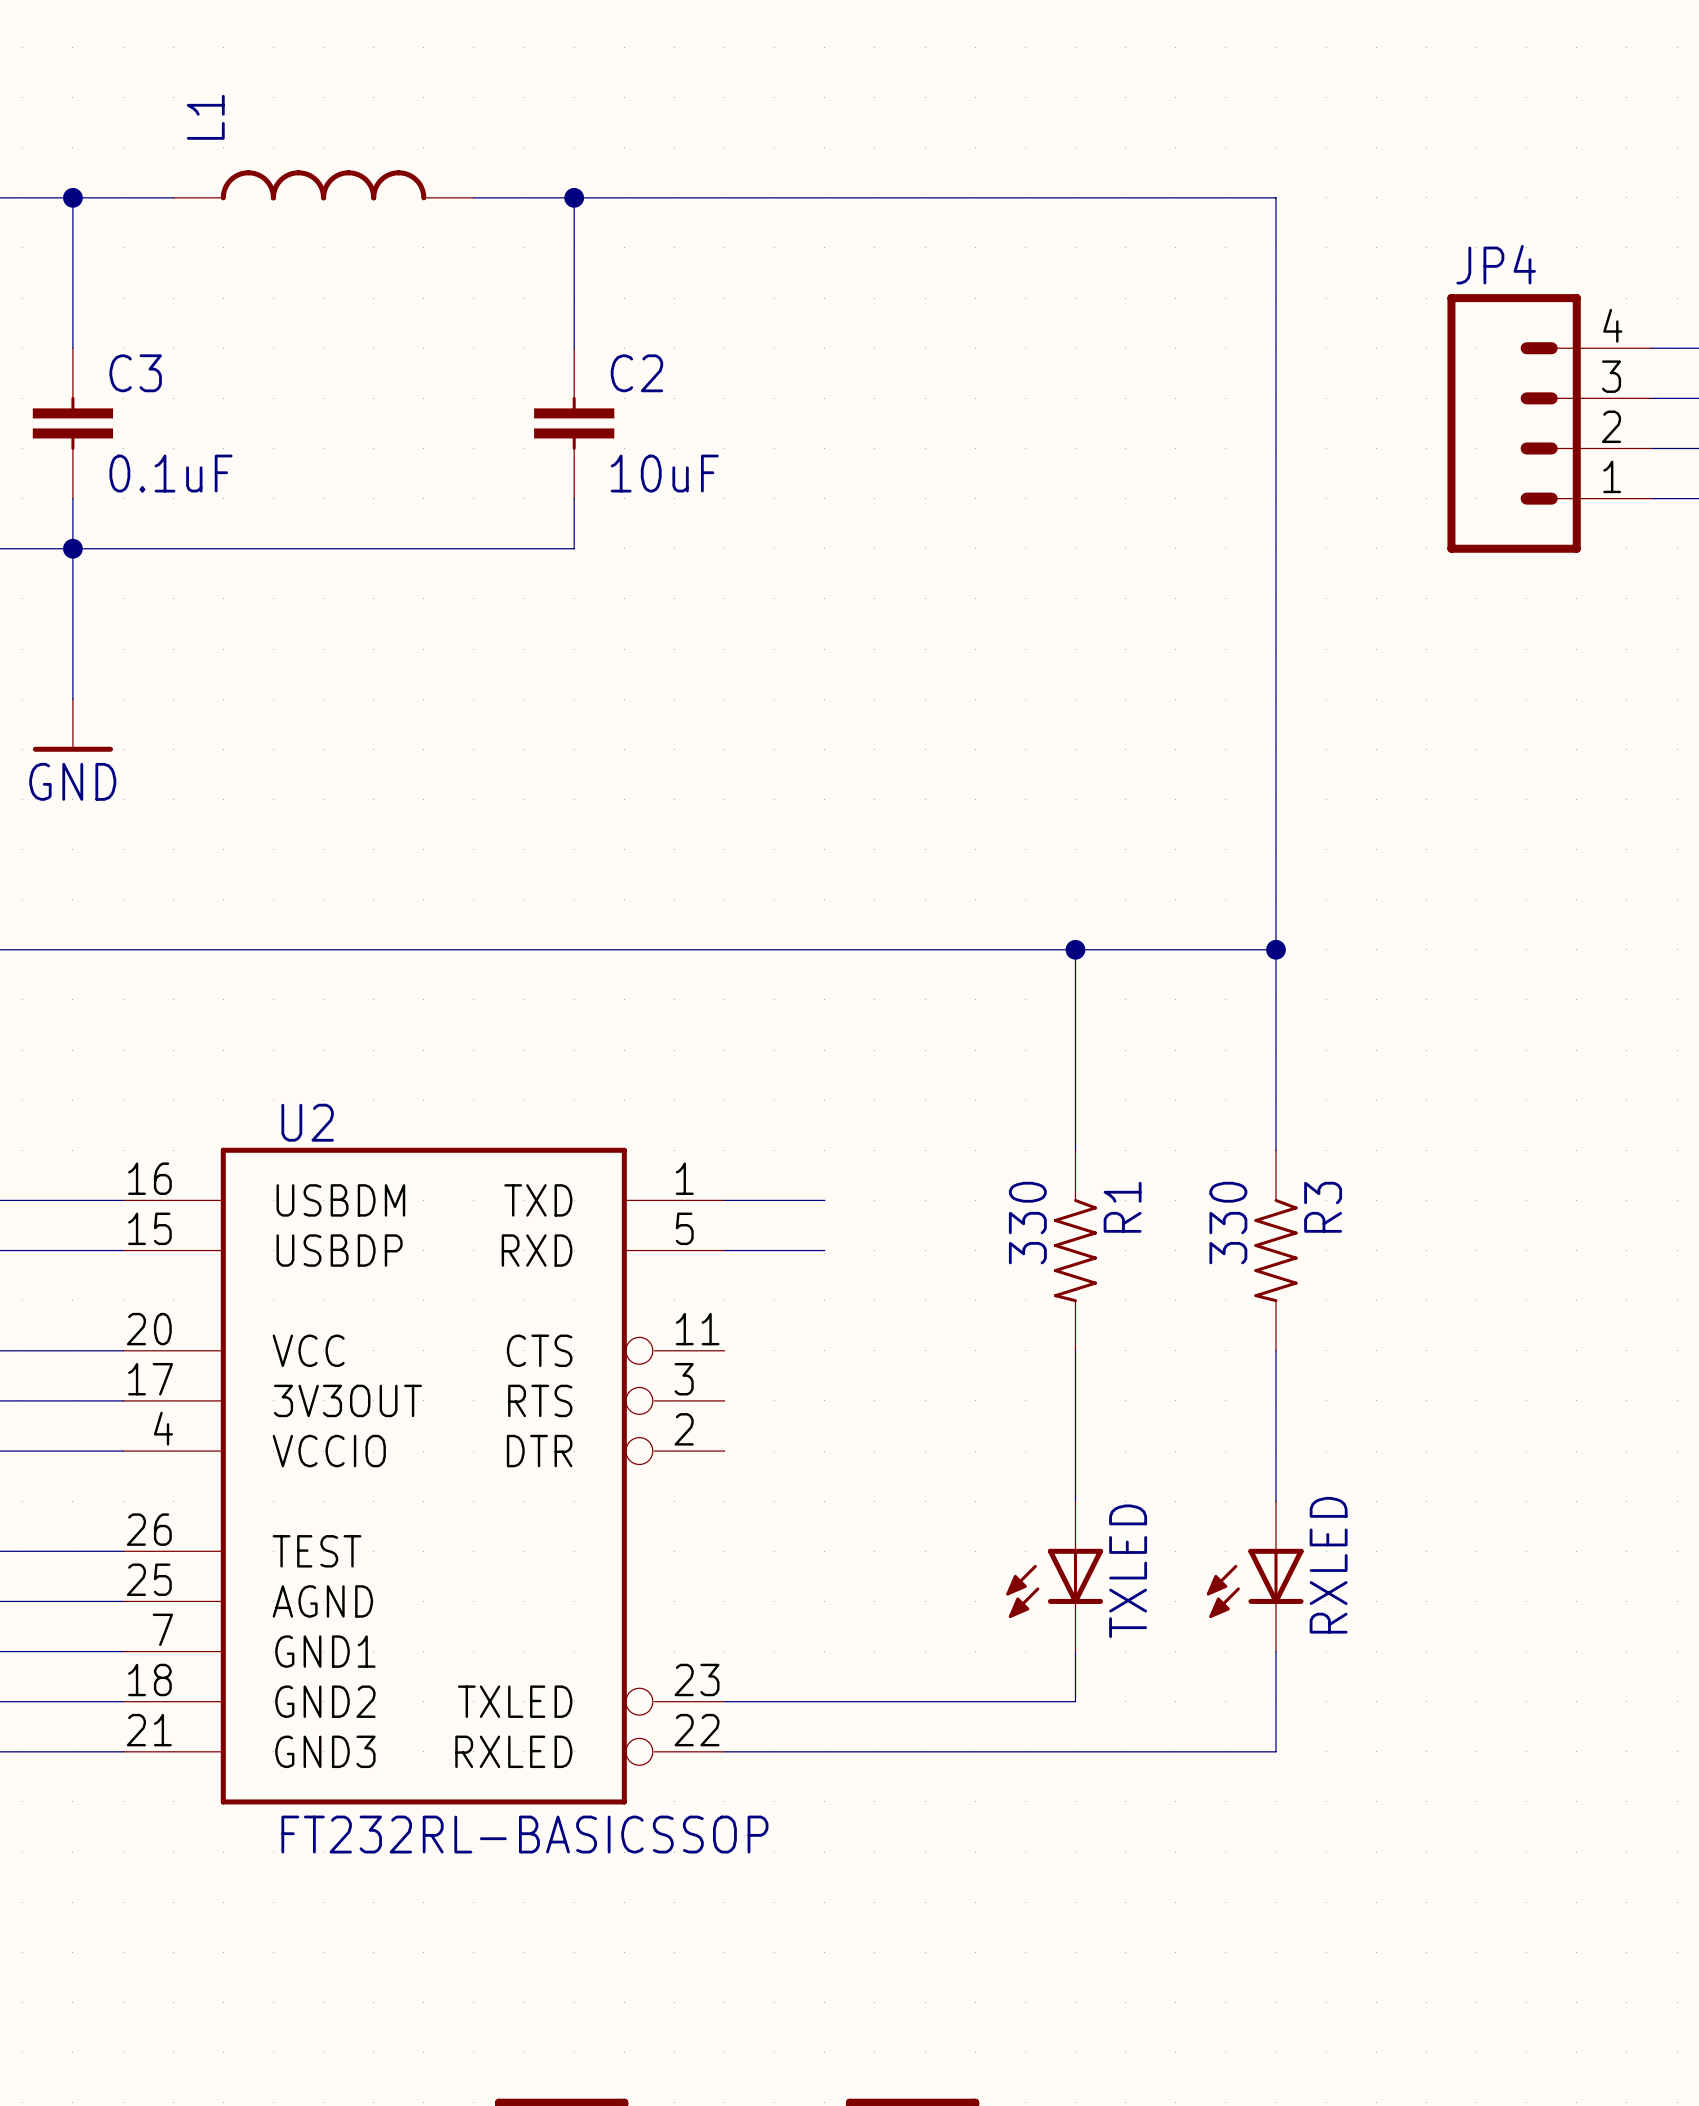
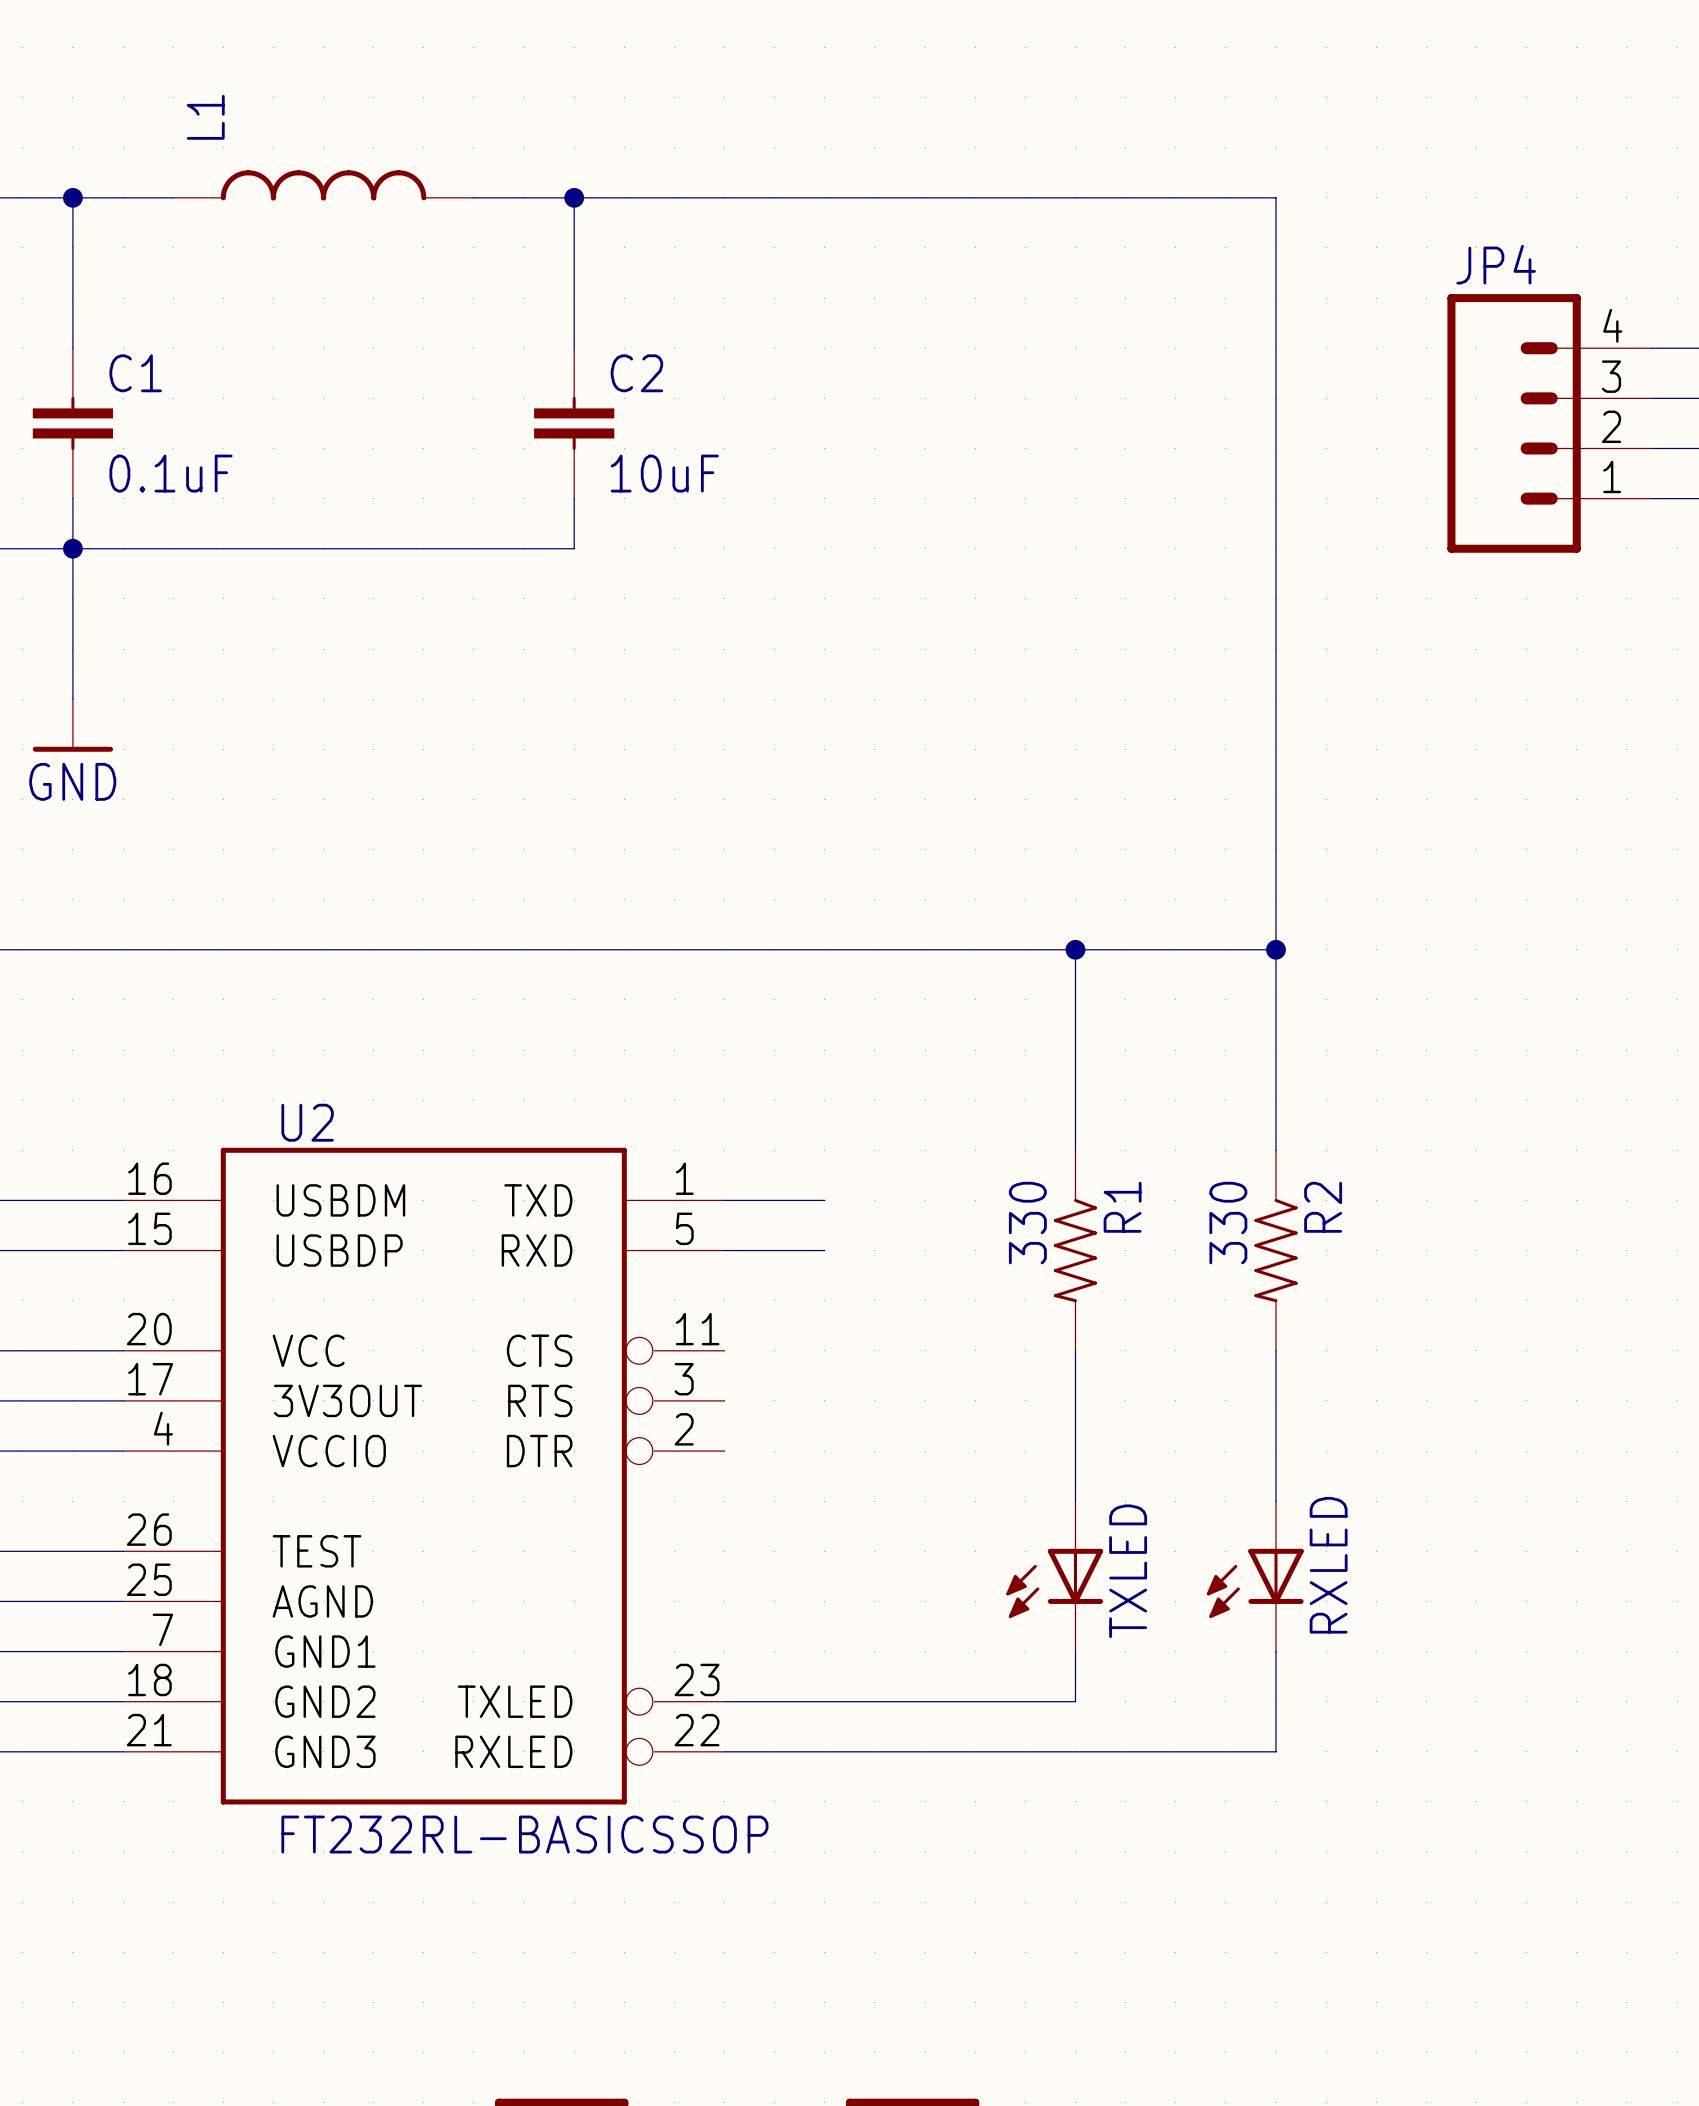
C3 name: C3 (135, 373) -> C1 (135, 373)
R3 name: R3 (1323, 1207) -> R2 (1323, 1207)

